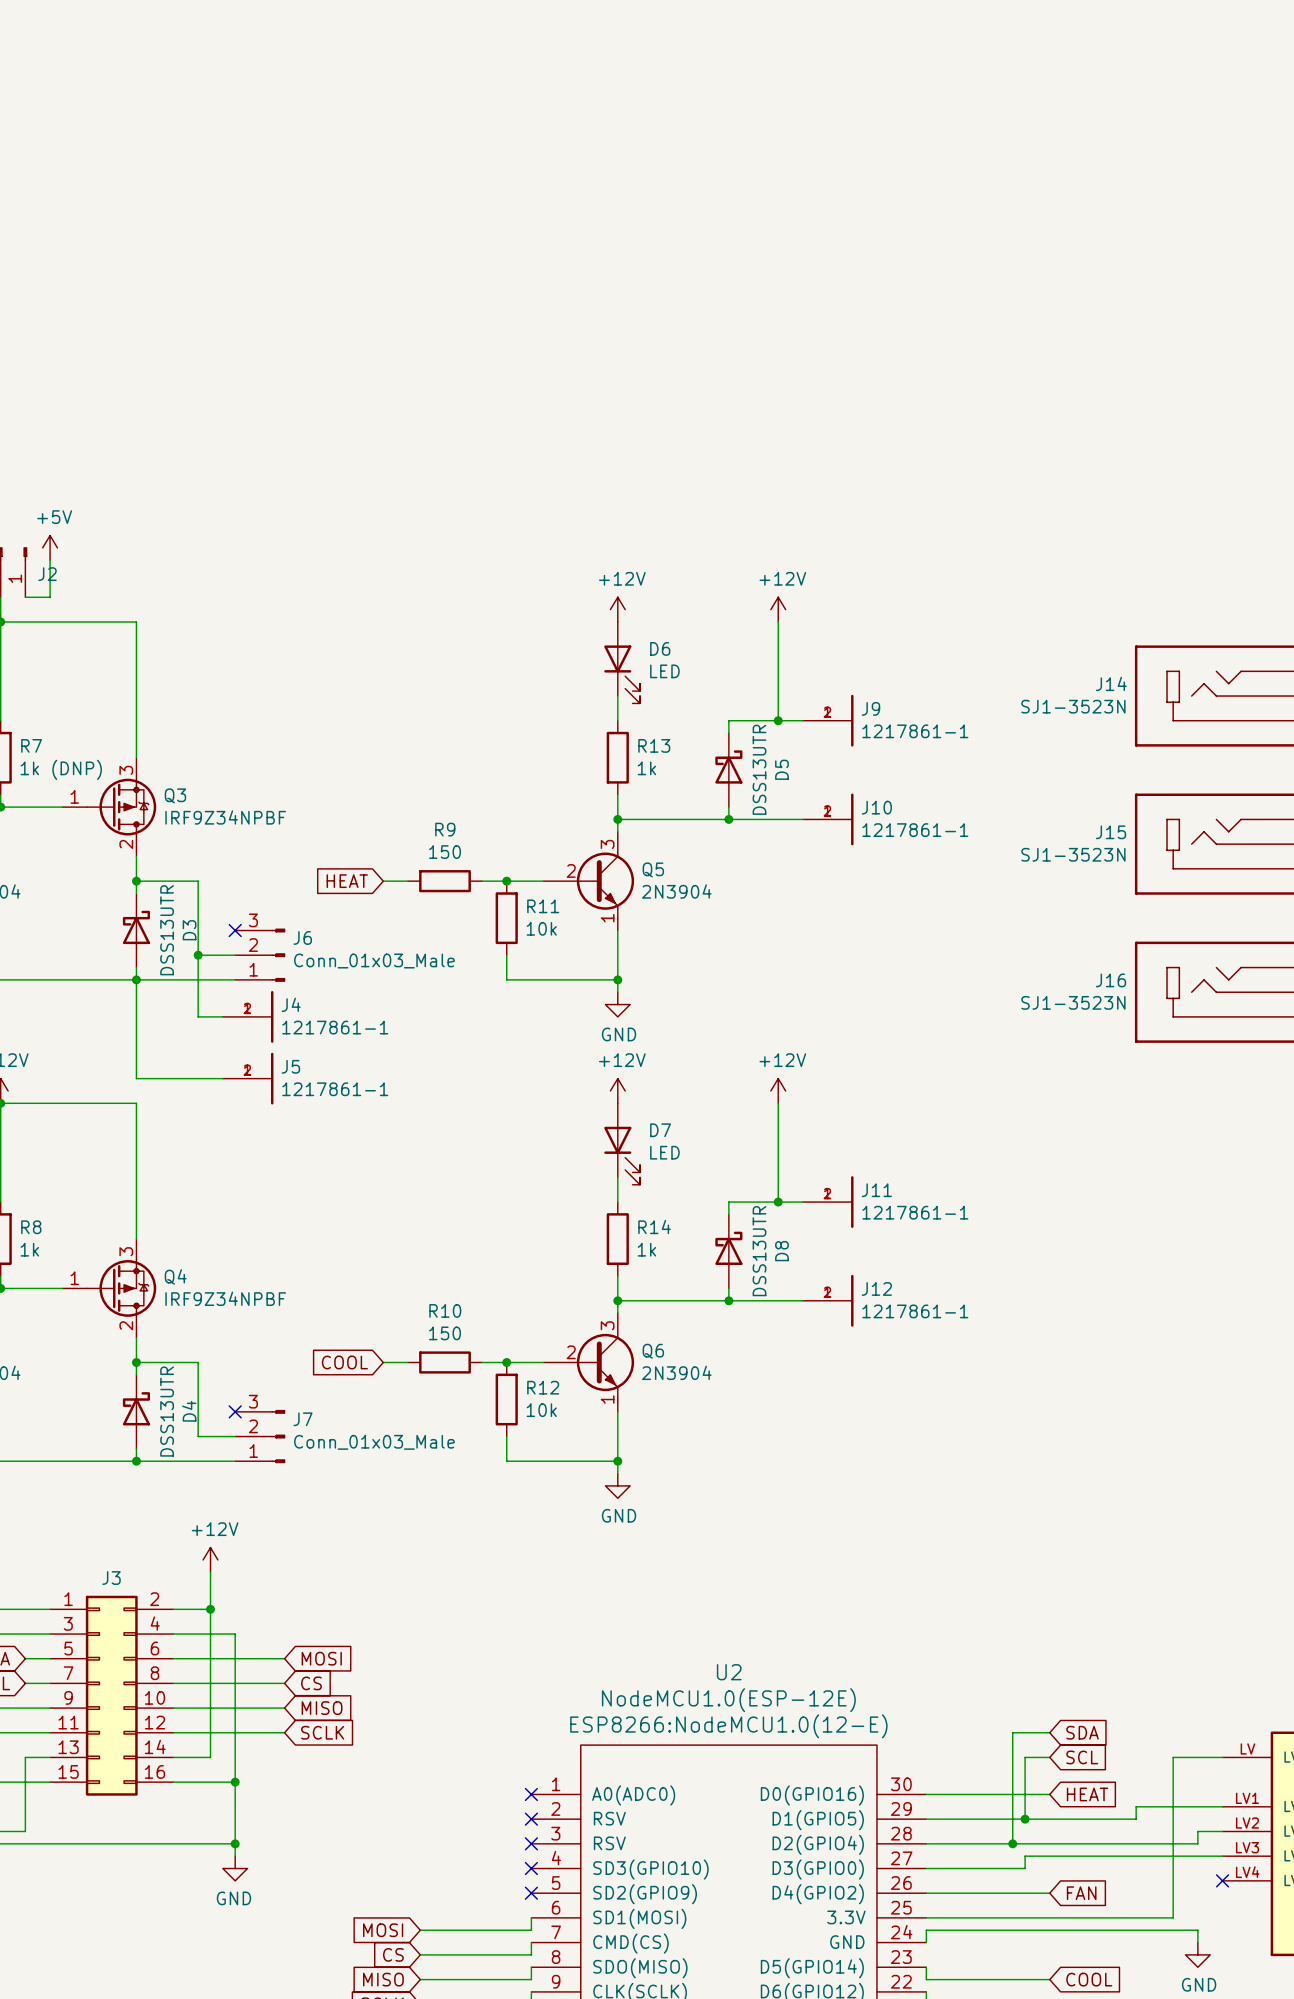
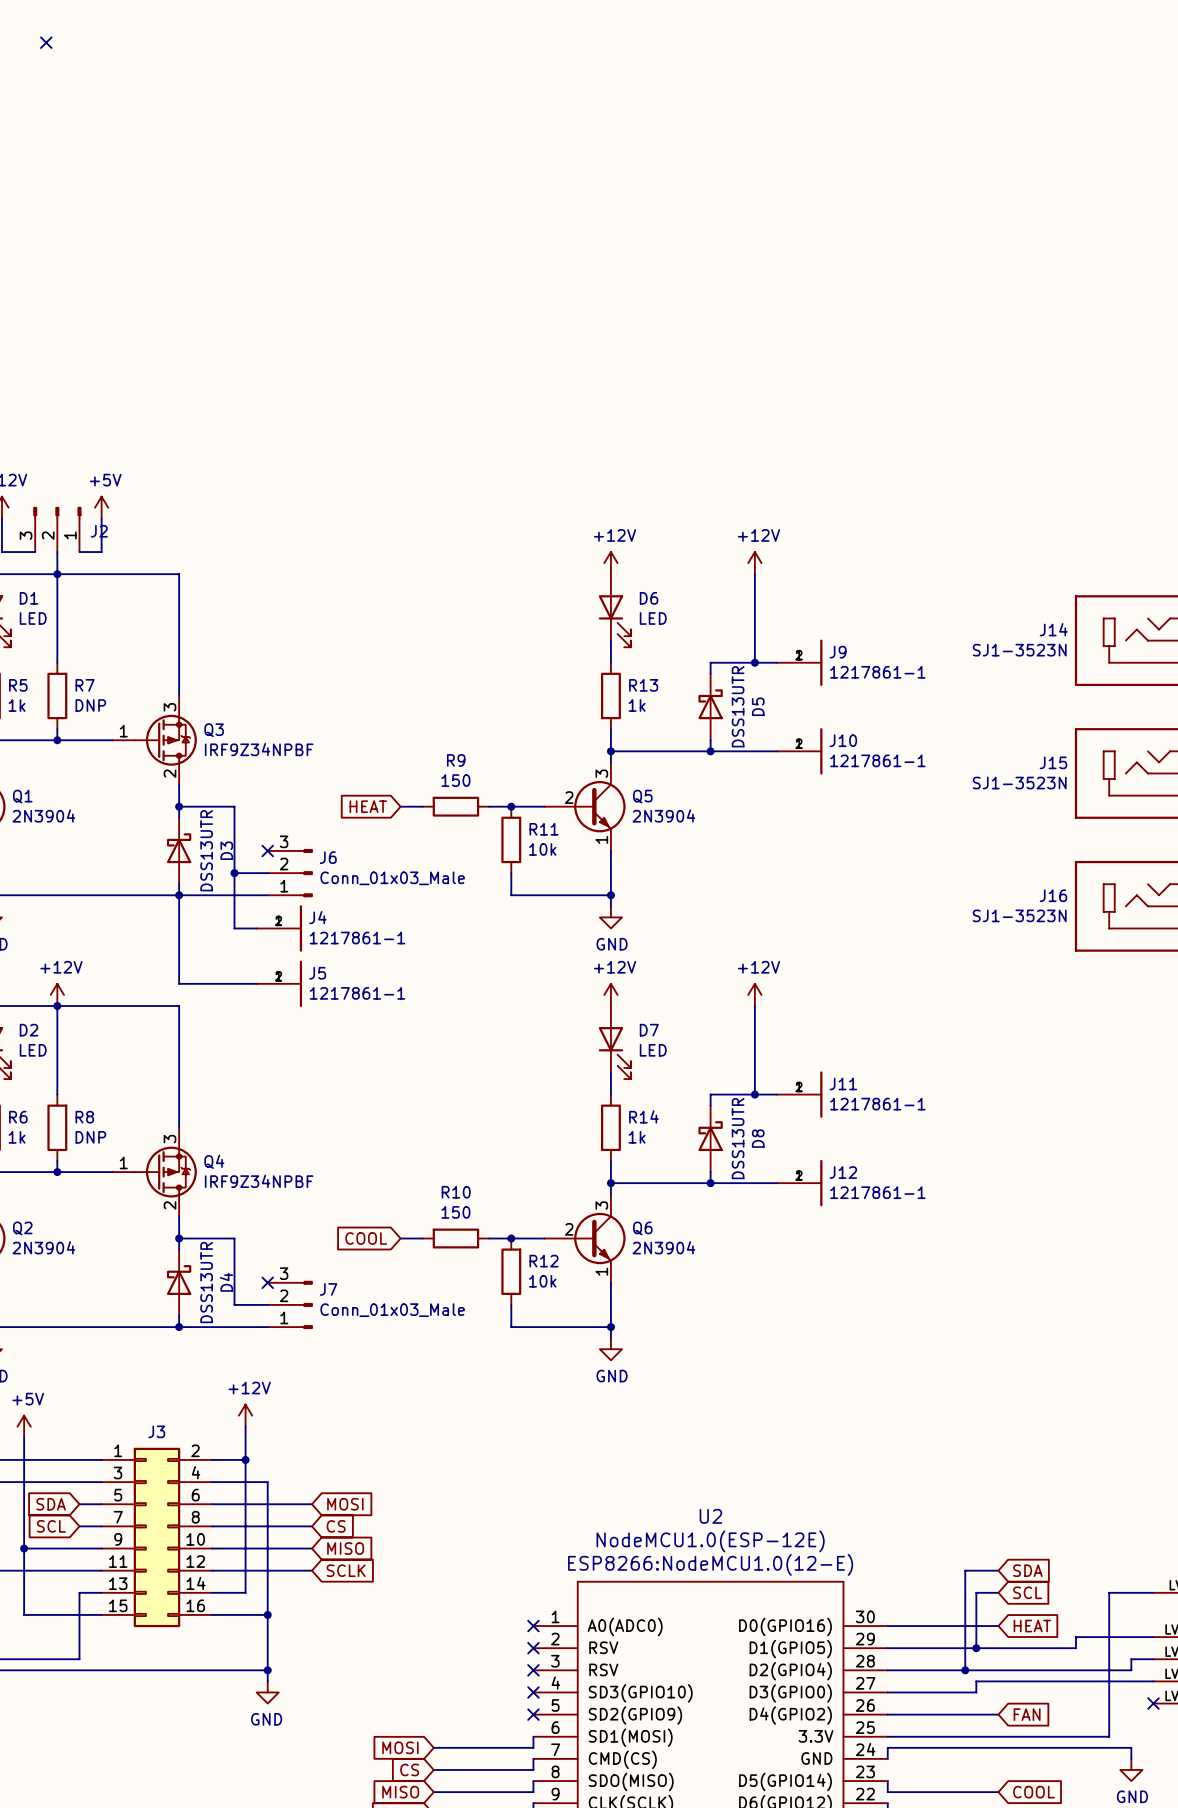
R7 value: 1k (DNP) (61, 769) -> DNP (90, 705)
R8 value: 1k (29, 1249) -> DNP (90, 1137)

